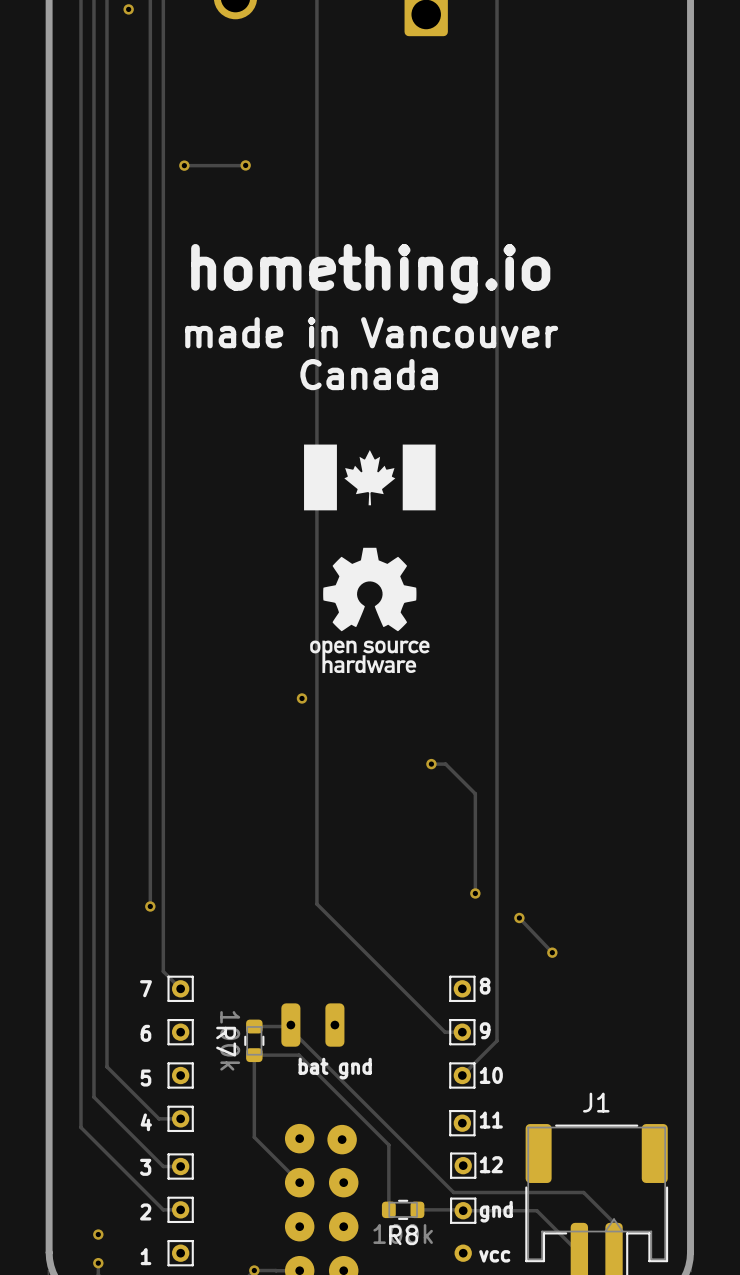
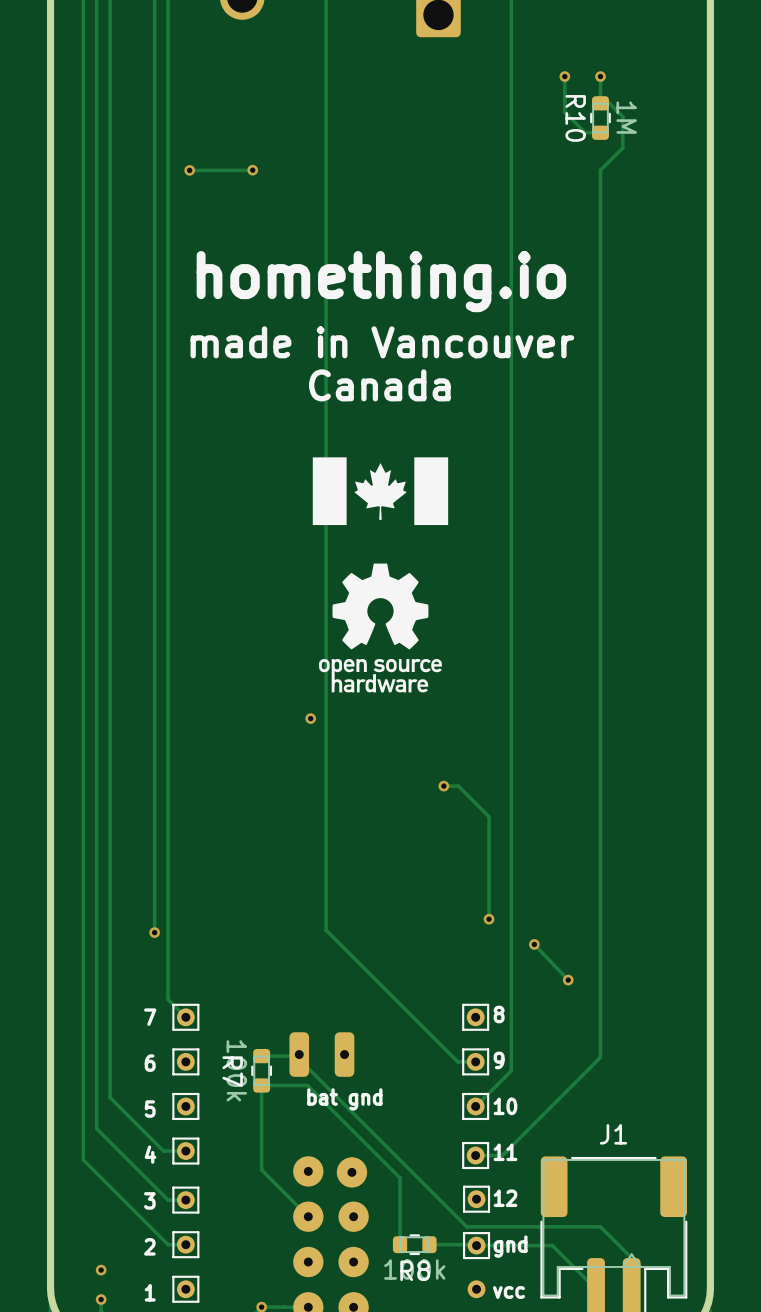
via: (128, 9) -> none
track: none -> (564, 76) (564, 112) (585, 132) (600, 132)
via: none -> (564, 76)
track: none -> (600, 76) (600, 103) (609, 103) (622, 116) (622, 147) (600, 170) (600, 1057) (502, 1155) (475, 1155)
via: none -> (600, 76)
R10: none -> 1M (600, 118)

